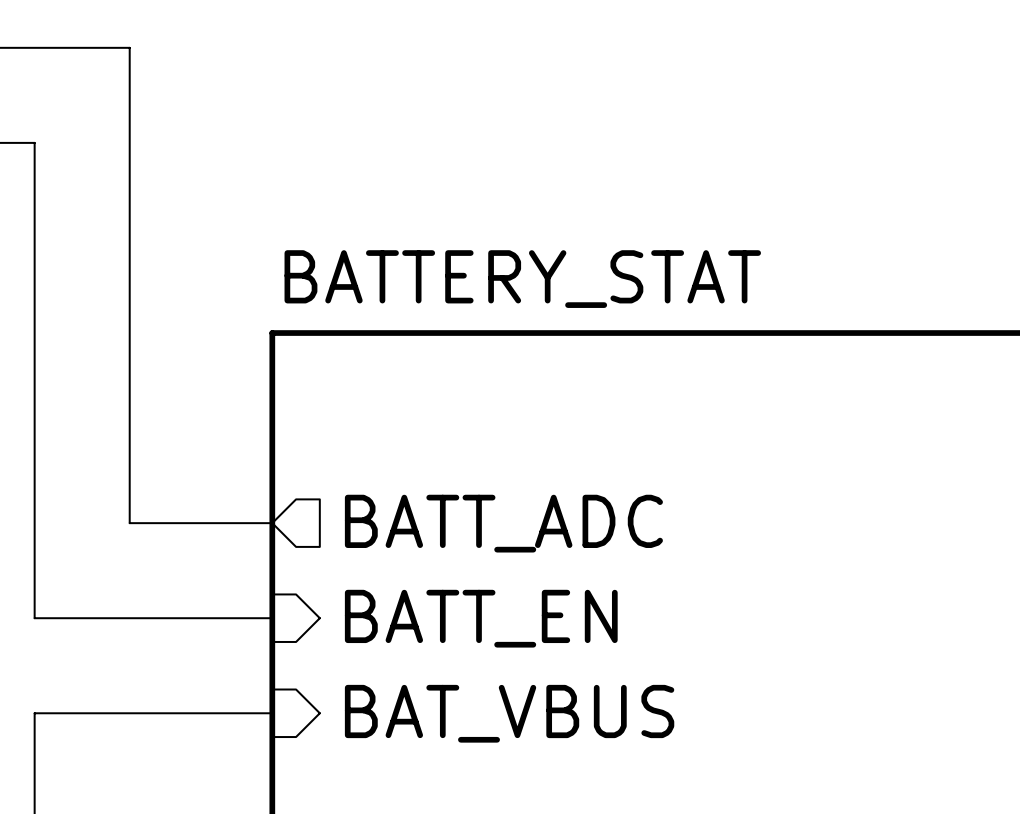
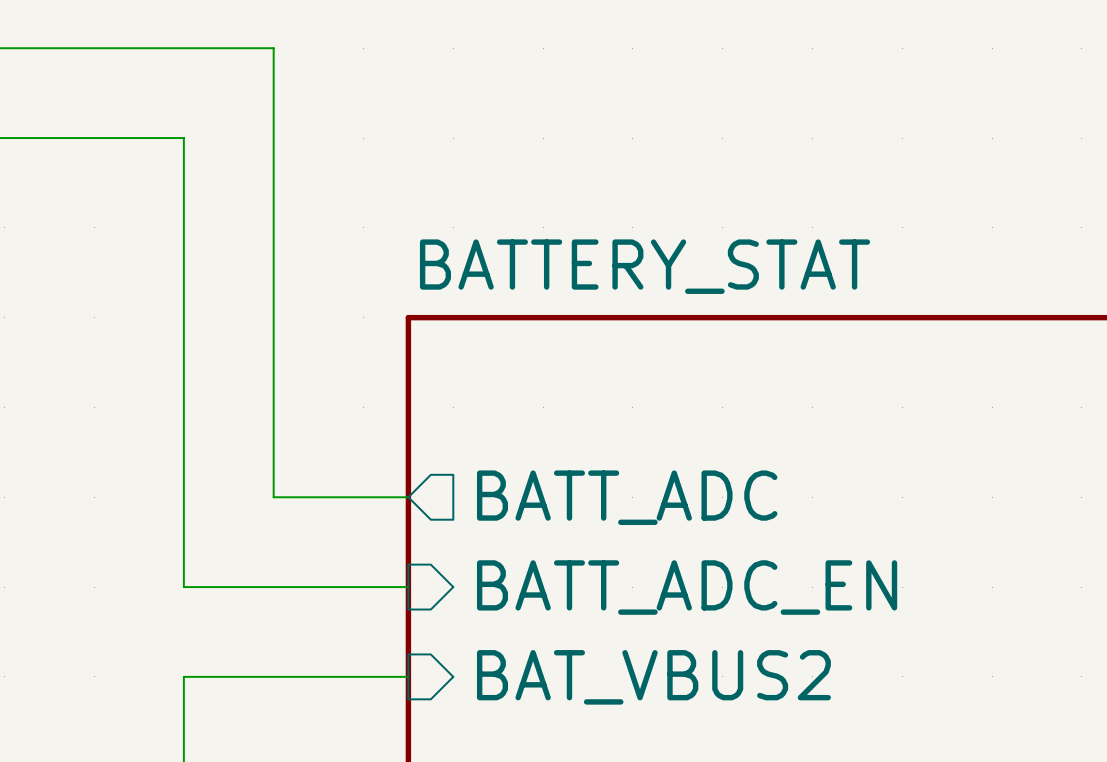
sheet pin: BATT_EN (481, 618) -> BATT_ADC_EN (687, 587)
sheet pin: BAT_VBUS (509, 713) -> BAT_VBUS2 (653, 677)

